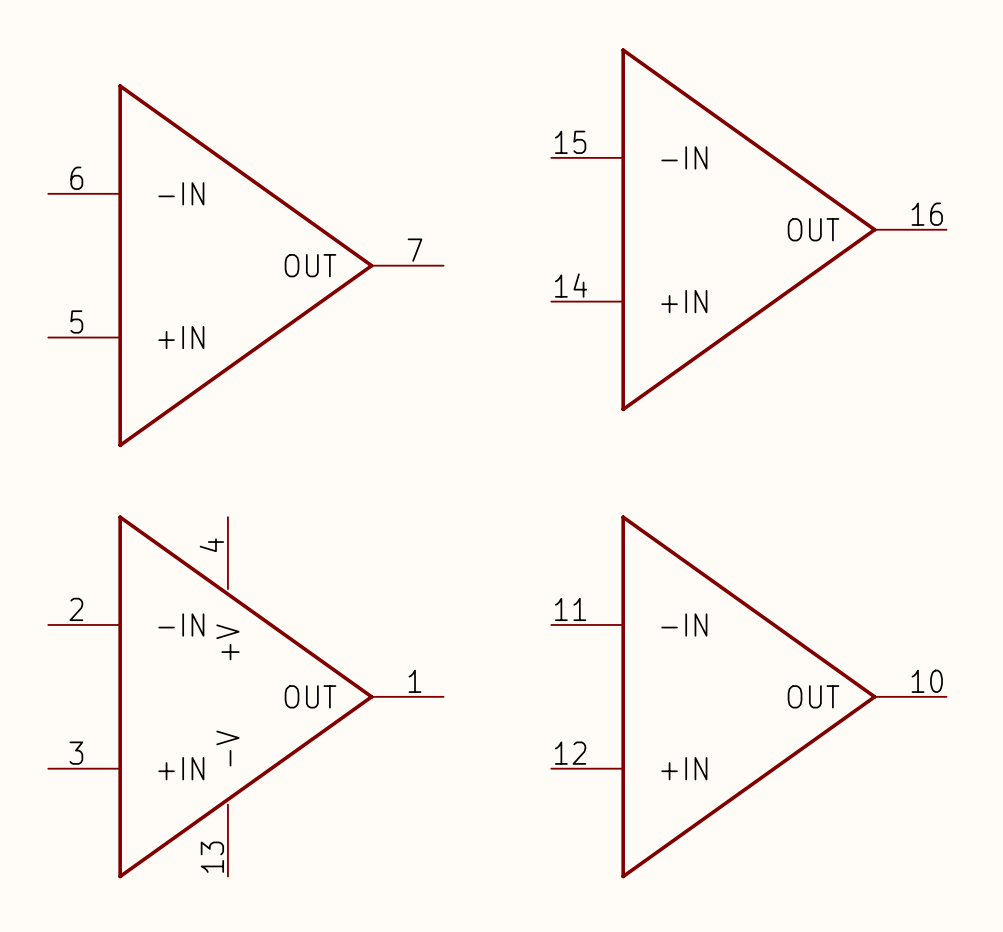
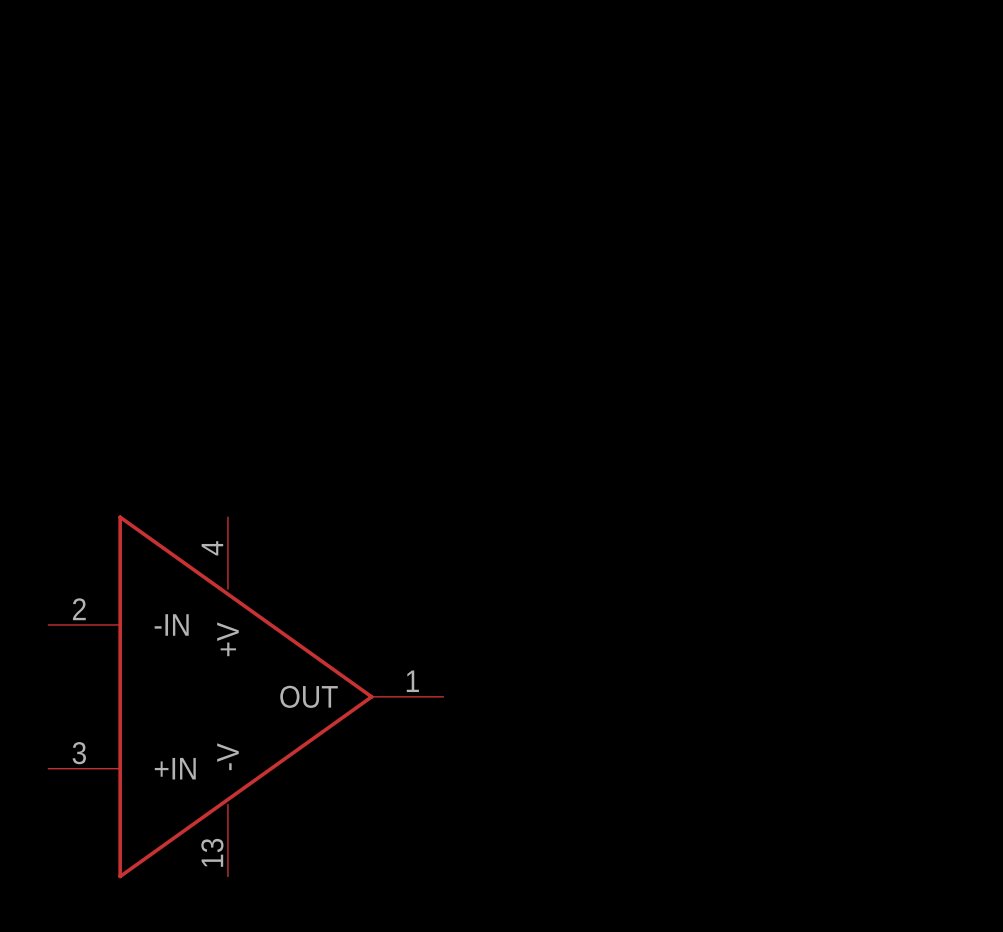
part: (748, 229) -> none
part: (245, 265) -> none
part: (748, 696) -> none

